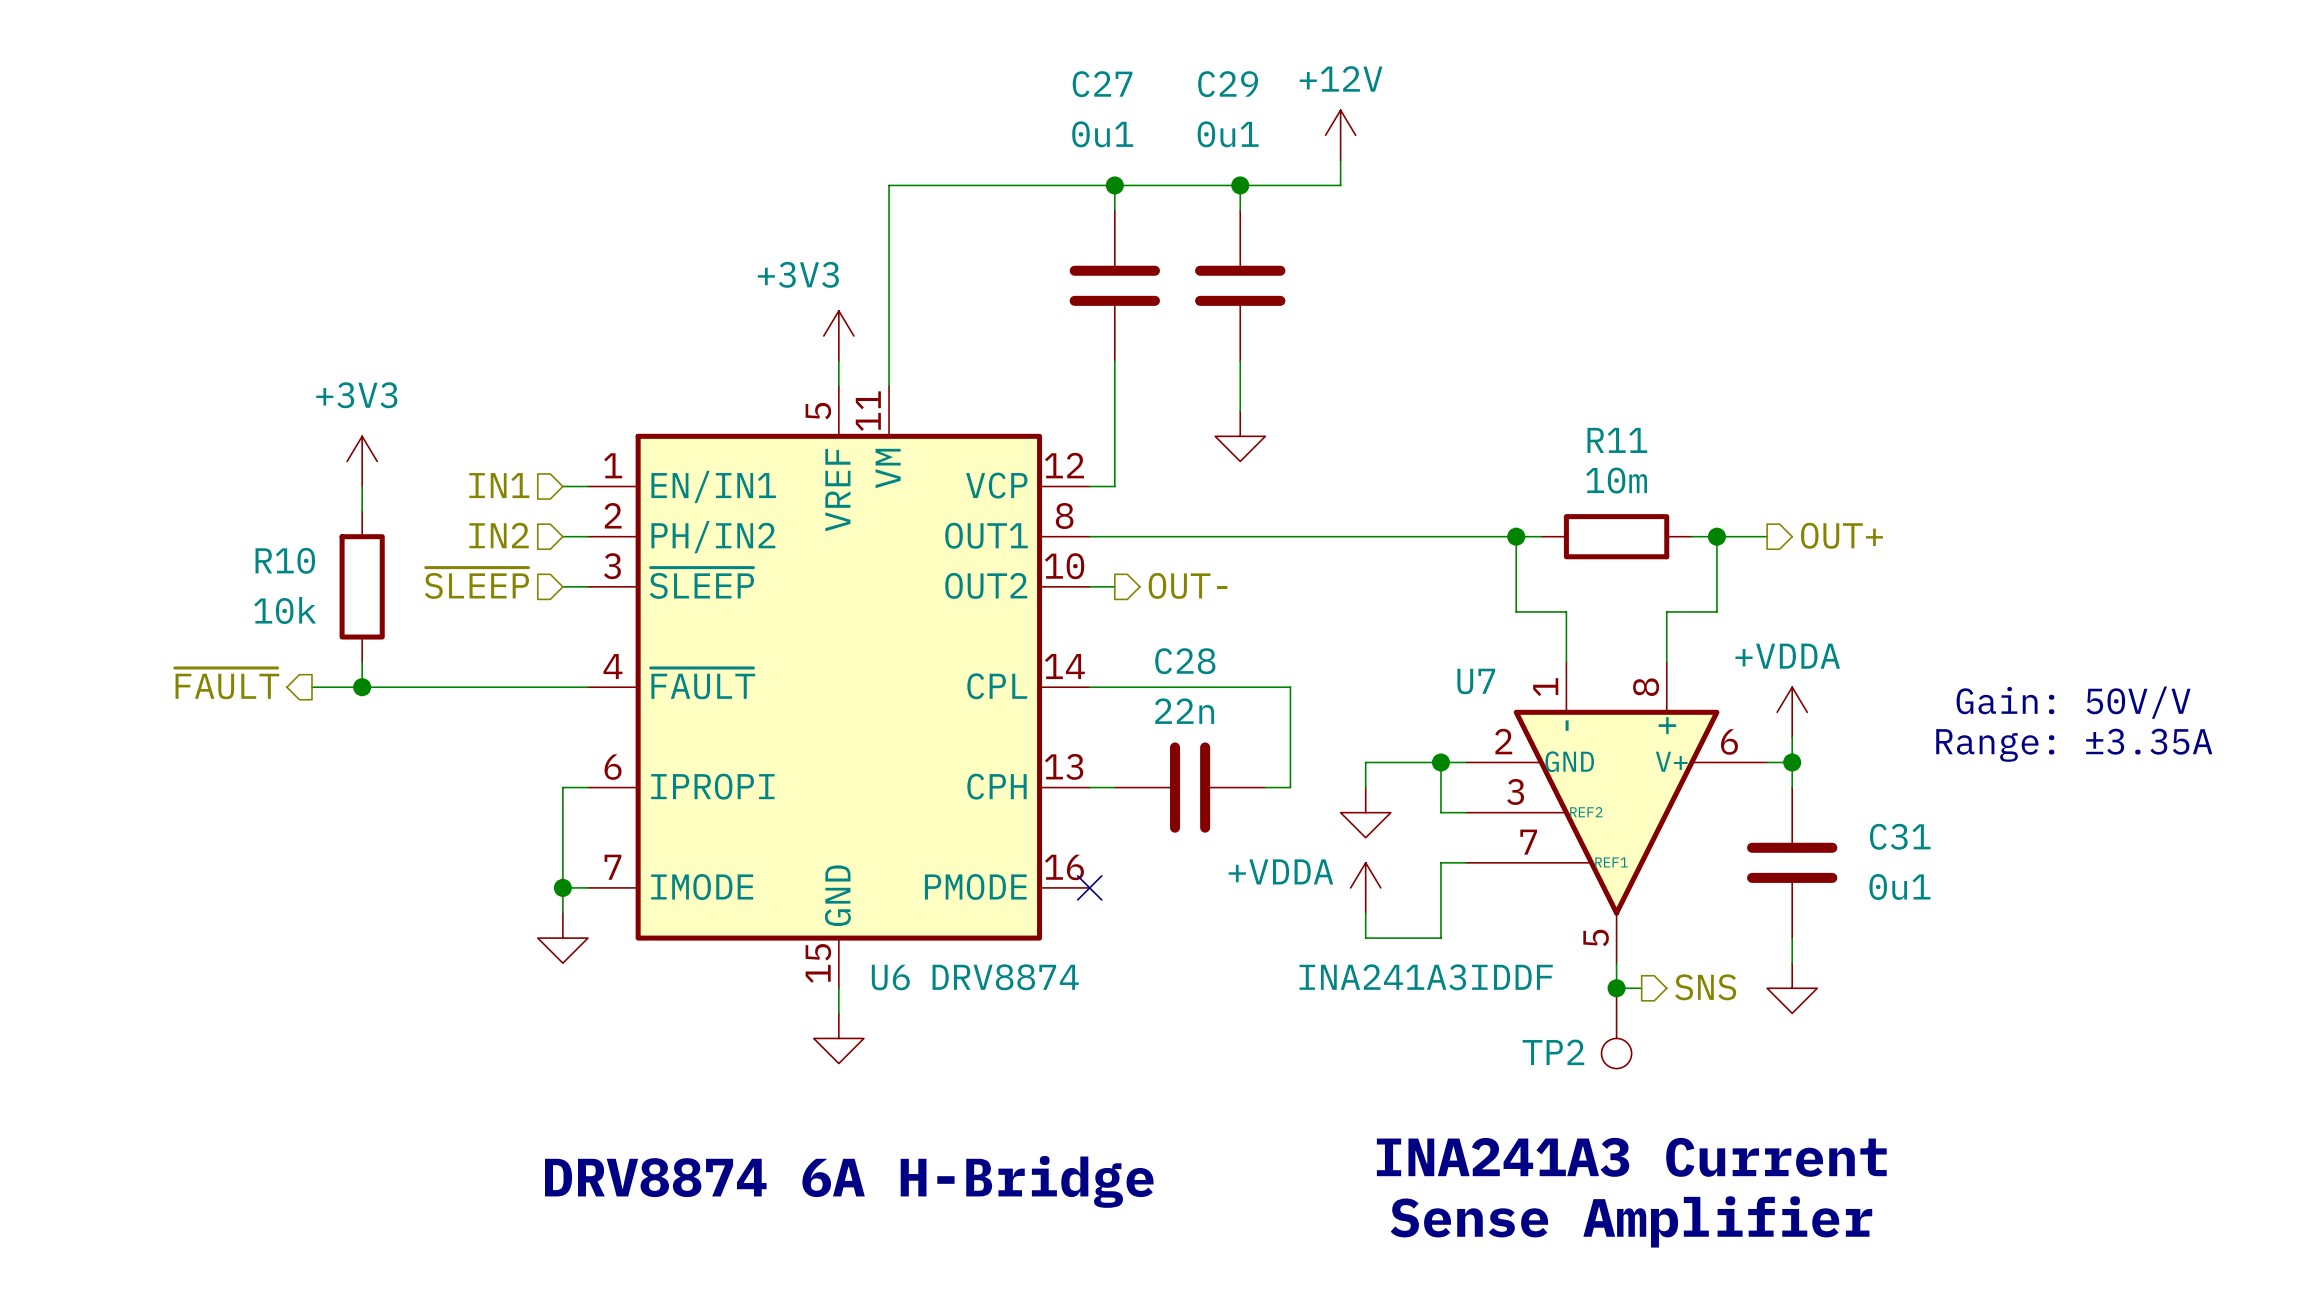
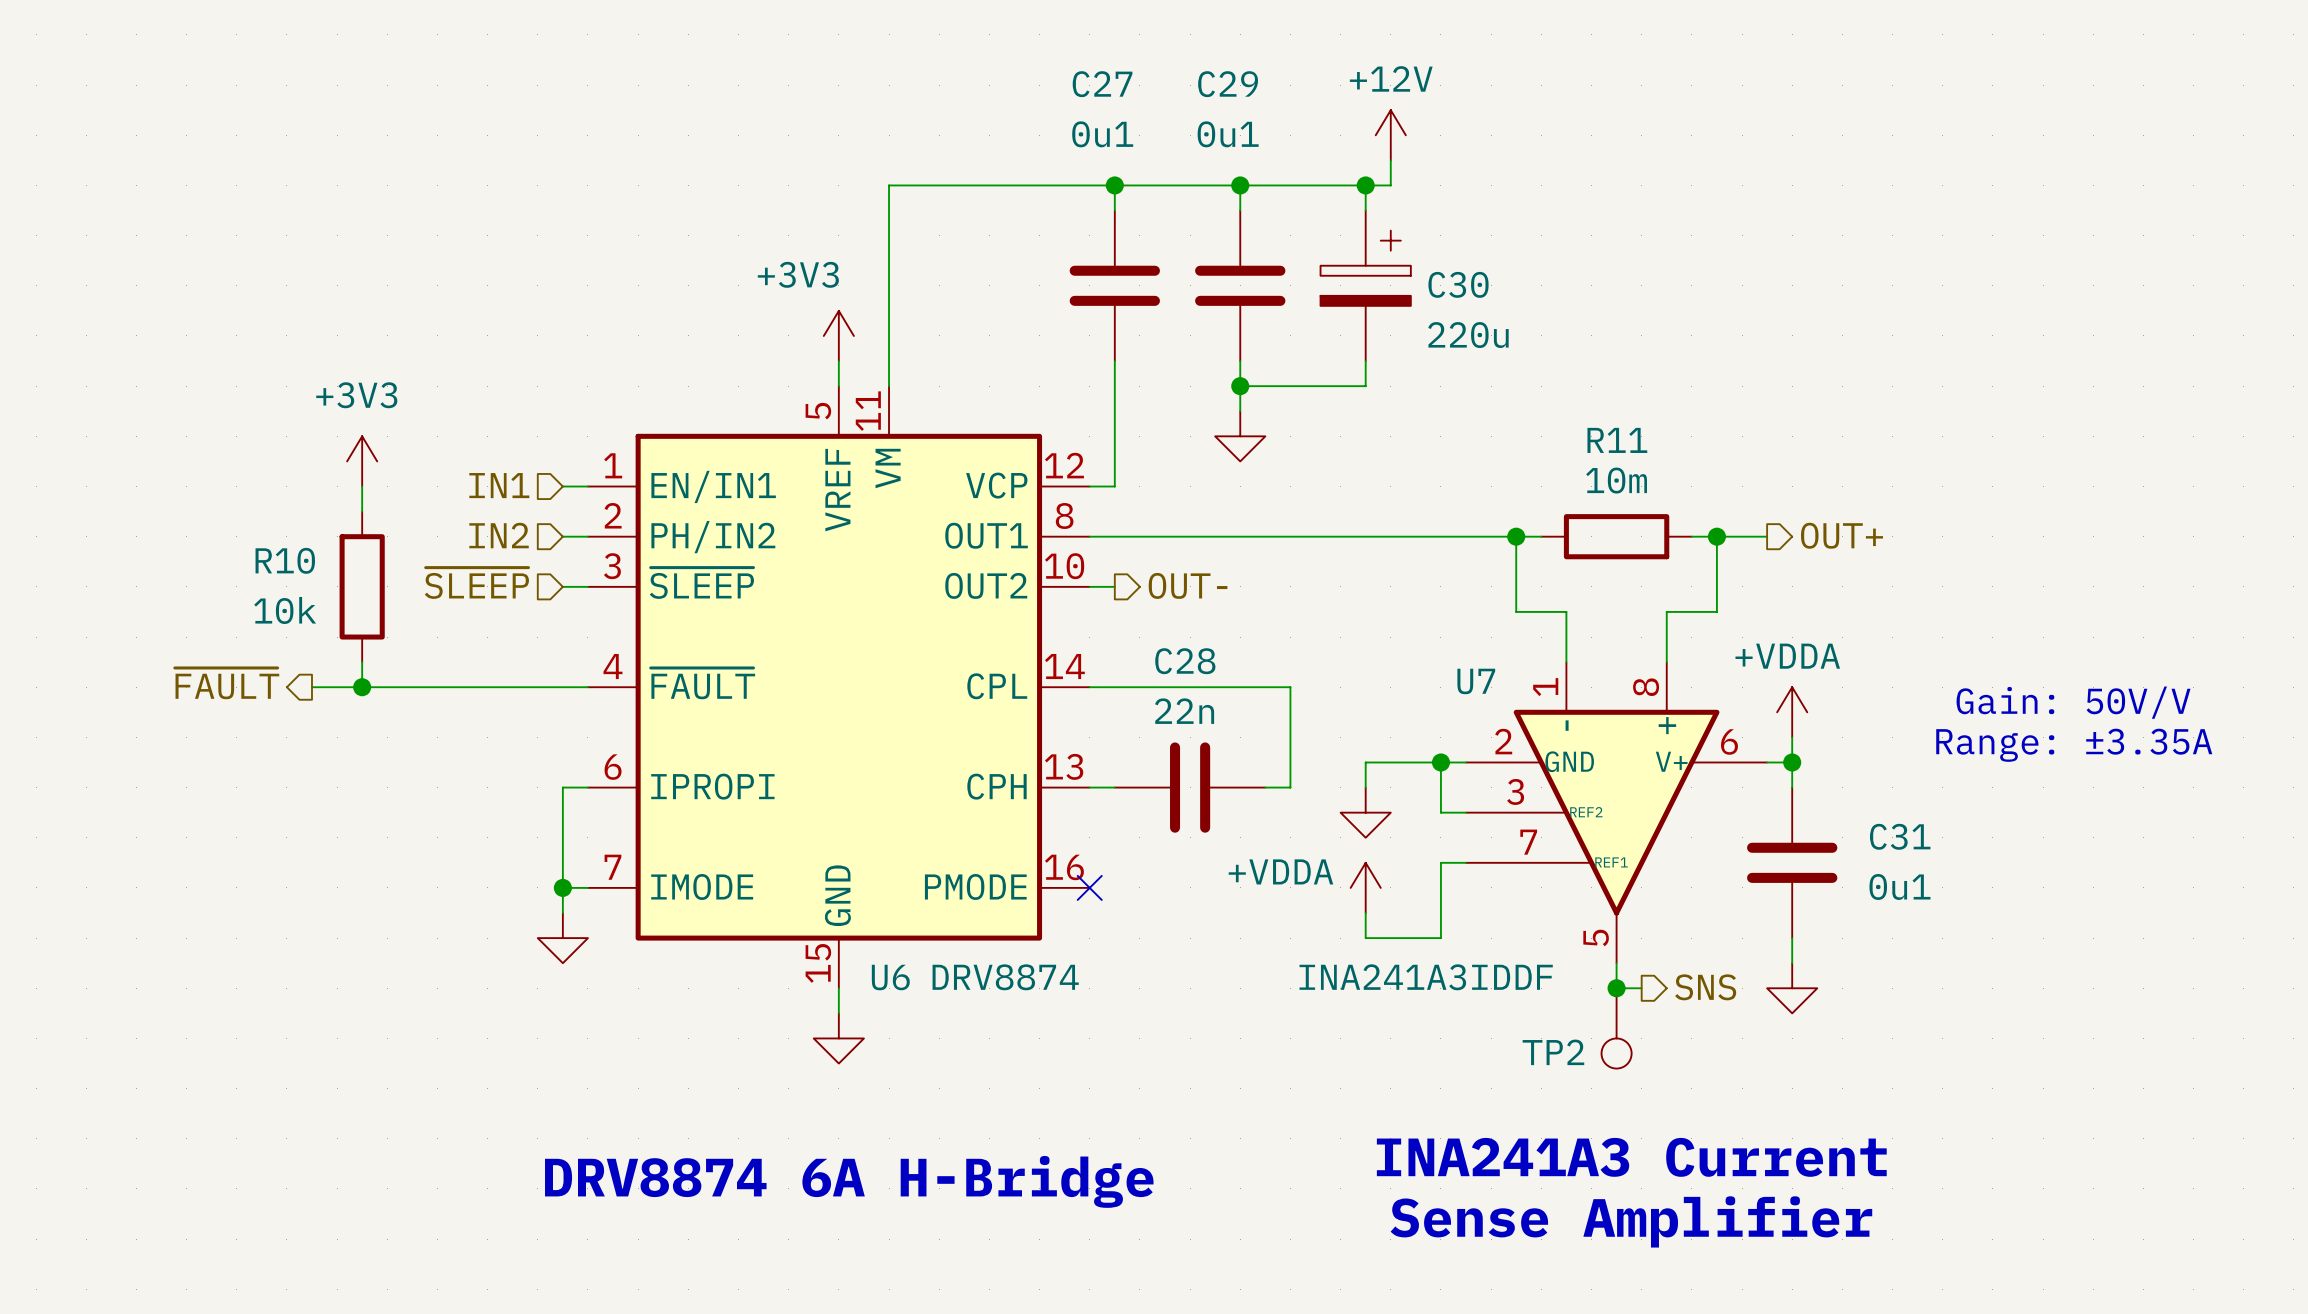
power symbol position: +12V (1340, 135) -> +12V (1390, 135)
wire: (1340, 160) (1340, 185) -> (1390, 160) (1390, 185) (1340, 185)
wire: none -> (1365, 185) (1365, 210)
junction: none -> (1365, 185)
C30: none -> 220u (1365, 285)
wire: none -> (1365, 361) (1365, 386) (1240, 386)
junction: none -> (1240, 386)

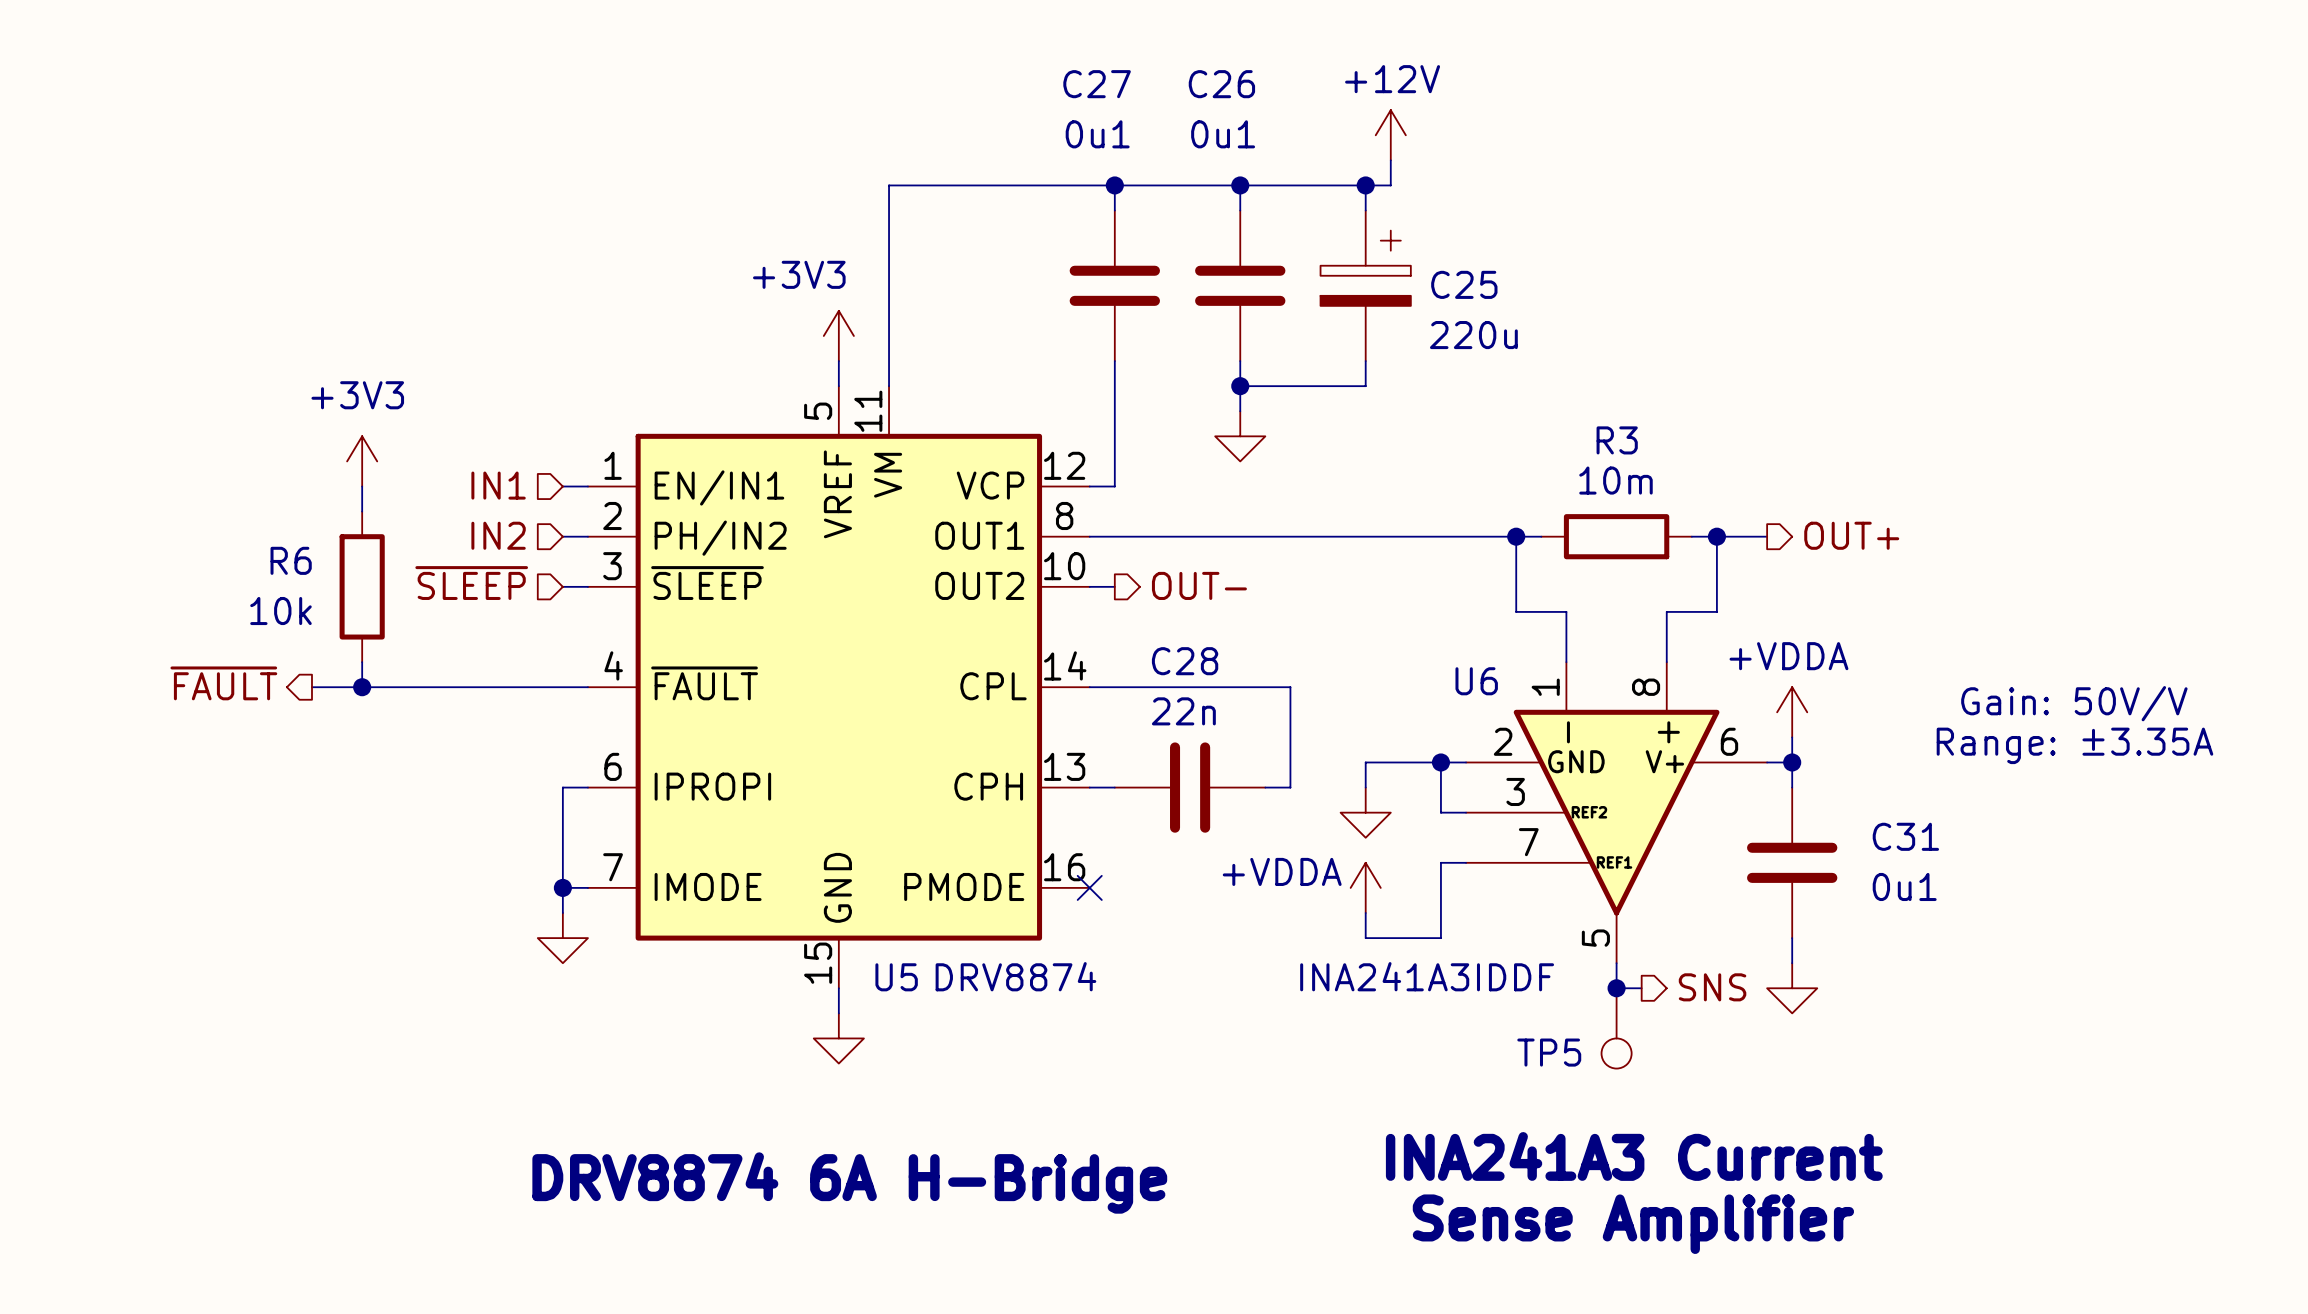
C29 name: C29 (1228, 84) -> C26 (1221, 84)
C30 name: C30 (1458, 284) -> C25 (1464, 284)
R11 name: R11 (1617, 440) -> R3 (1617, 440)
R10 name: R10 (285, 560) -> R6 (291, 560)
U7 name: U7 (1476, 681) -> U6 (1476, 681)
U6 name: U6 (890, 977) -> U5 (896, 977)
TP2 name: TP2 (1553, 1052) -> TP5 (1549, 1052)

